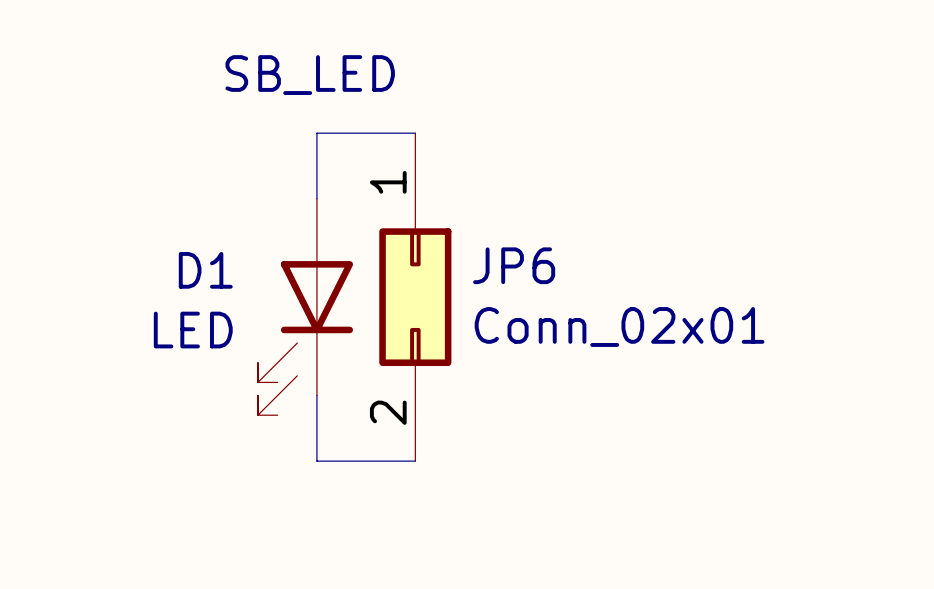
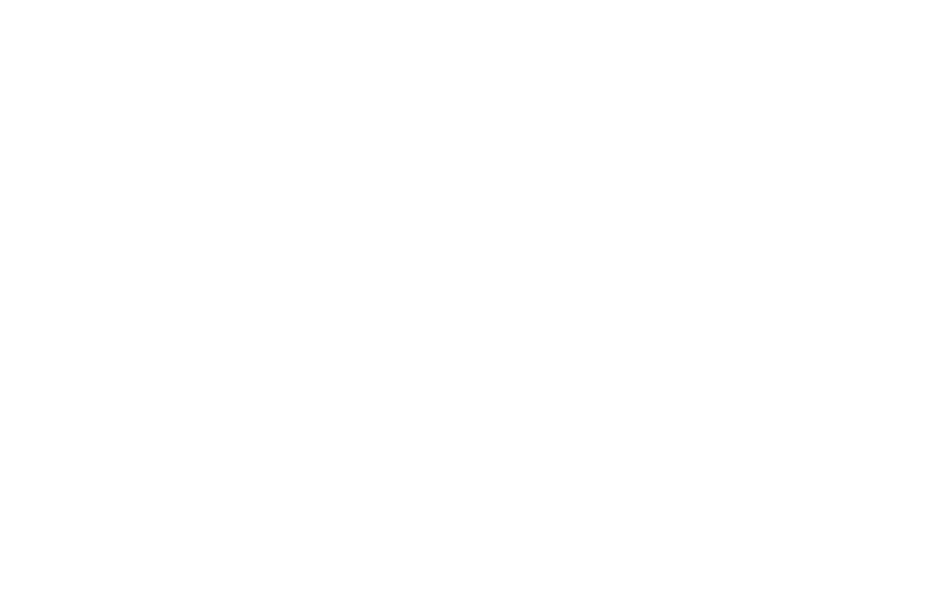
text: SB_LED (310, 75) -> none
wire: (415, 133) (316, 133) (316, 198) -> none
JP6: Conn_02x01 (415, 297) -> none
D1: LED (305, 306) -> none
wire: (316, 395) (316, 461) (415, 461) -> none

